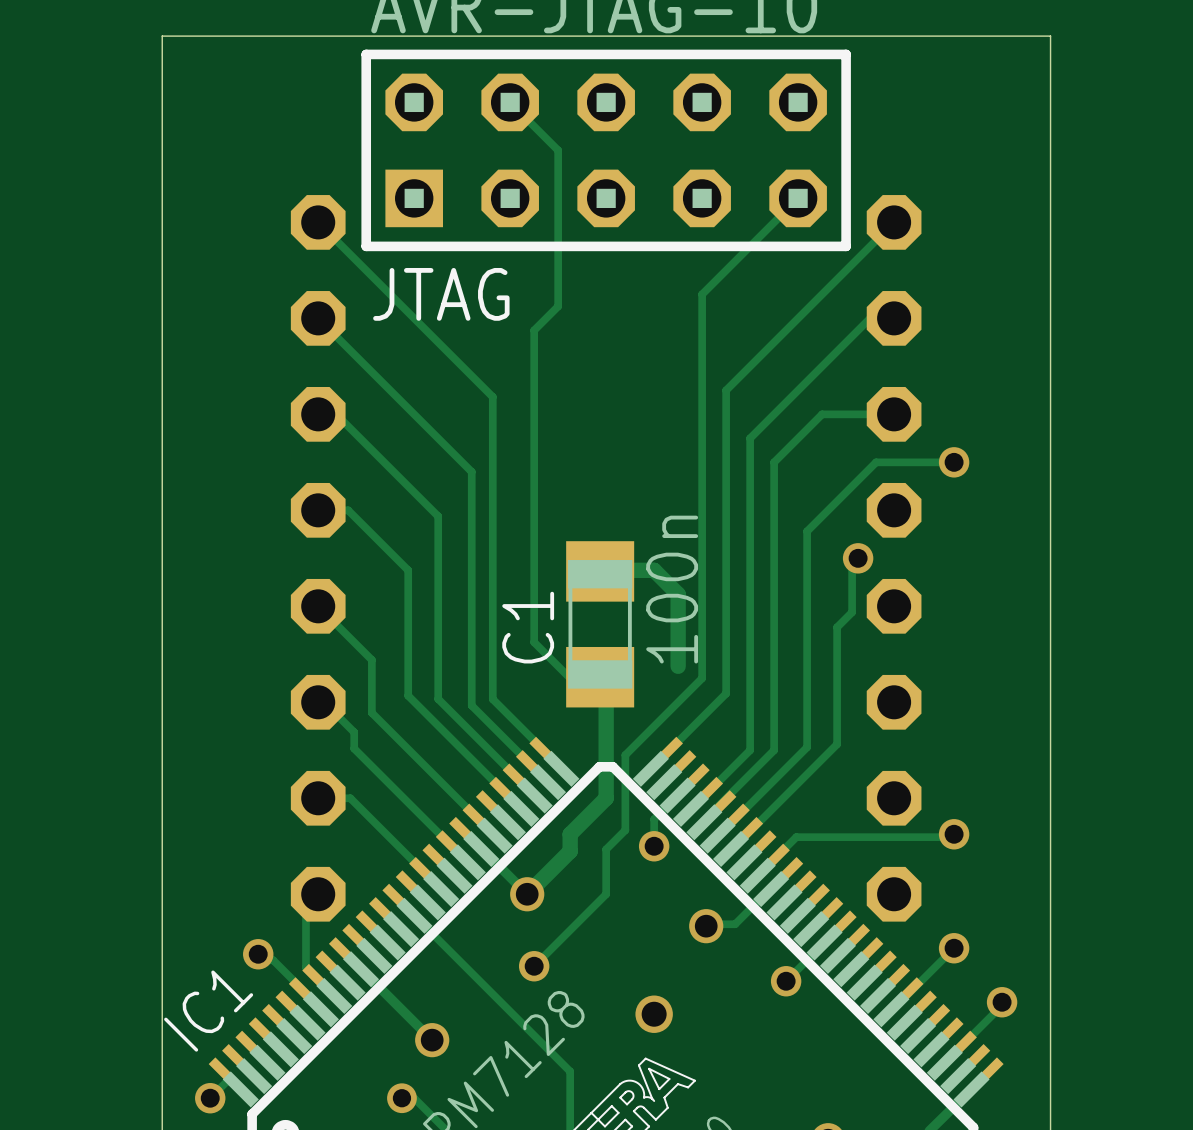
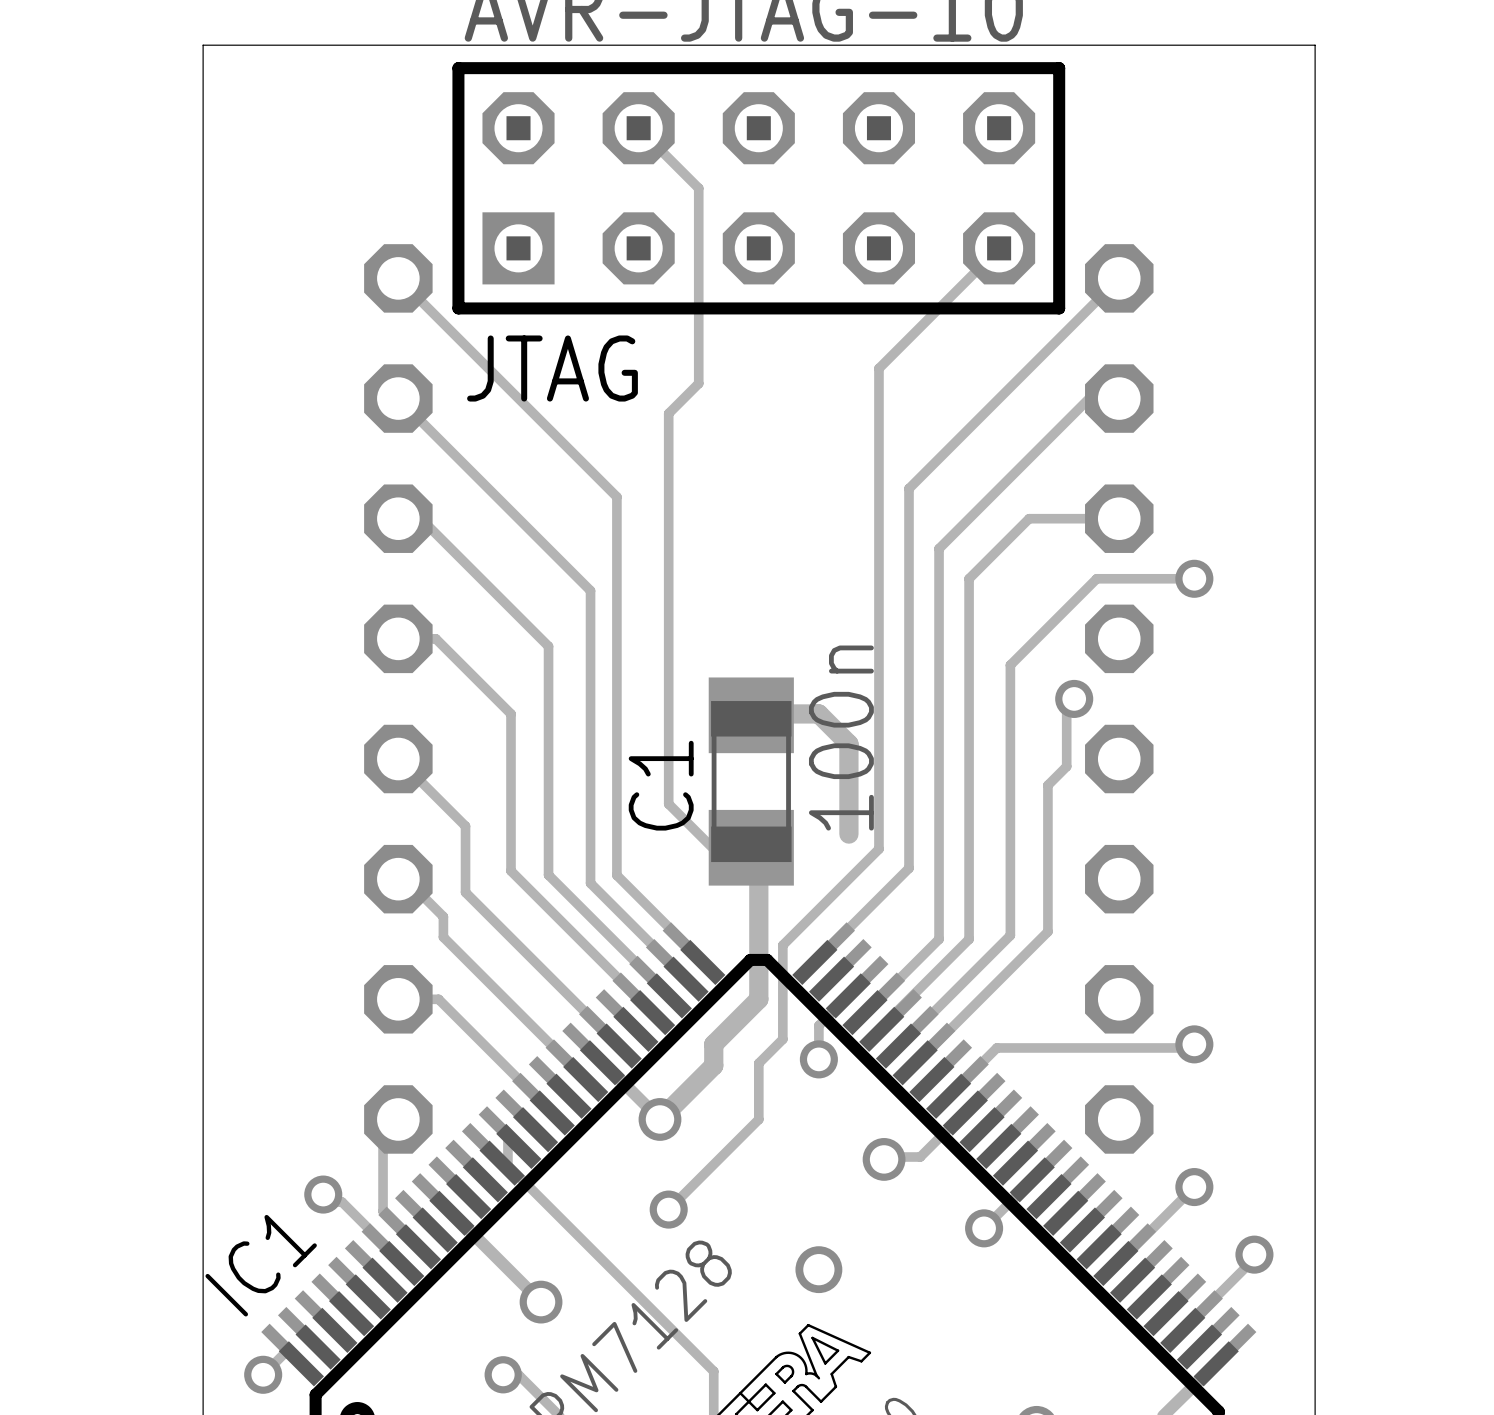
track: (405, 907) (570, 1071) (570, 1095) -> (507, 1135) (507, 1165) (713, 1371)

